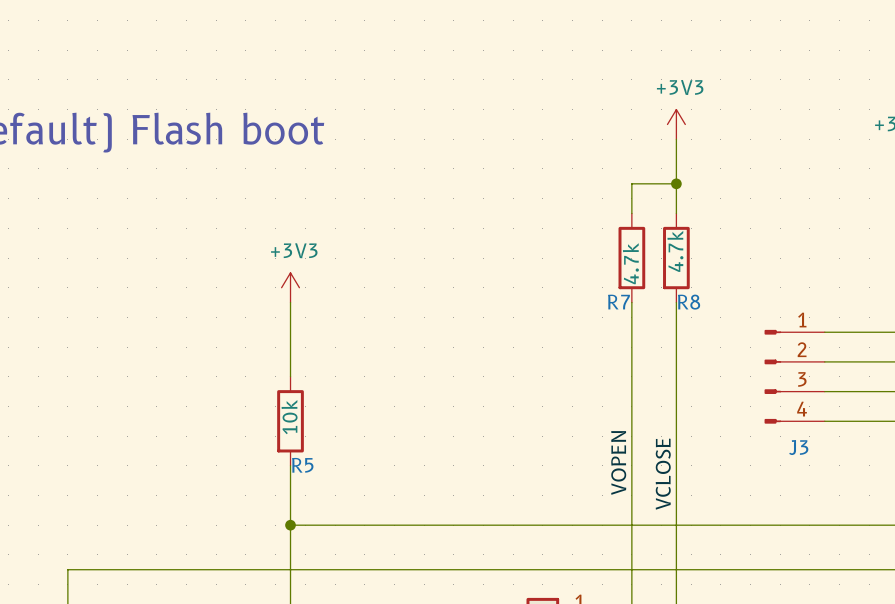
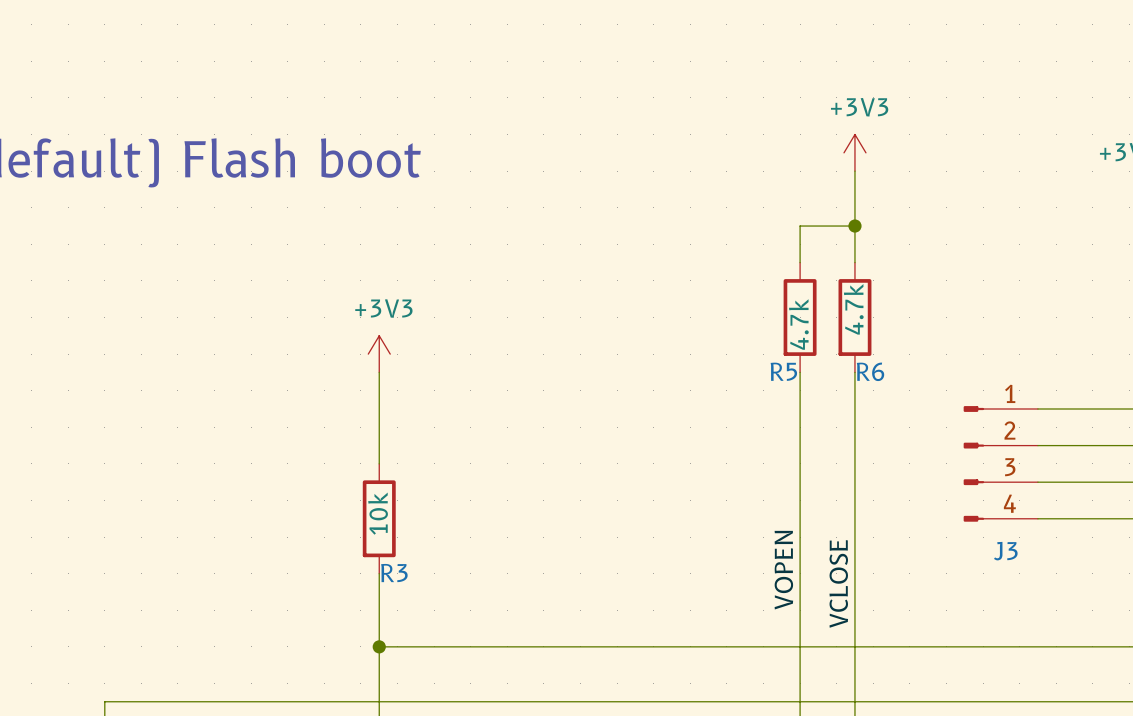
R7 name: R7 (618, 302) -> R5 (783, 371)
R8 name: R8 (689, 302) -> R6 (870, 371)
R5 name: R5 (302, 465) -> R3 (394, 573)

